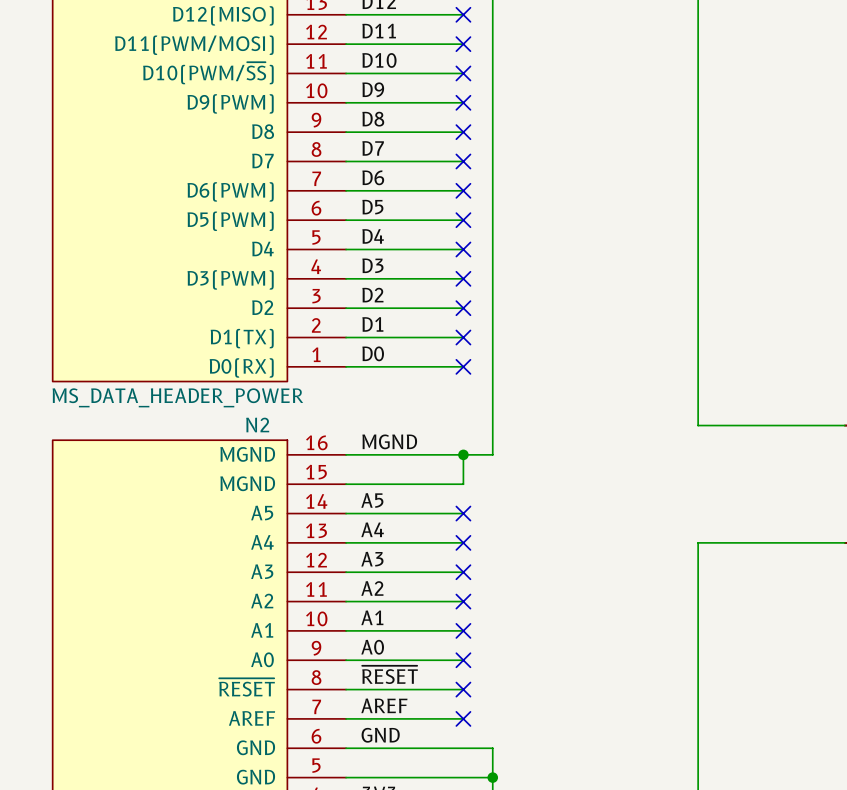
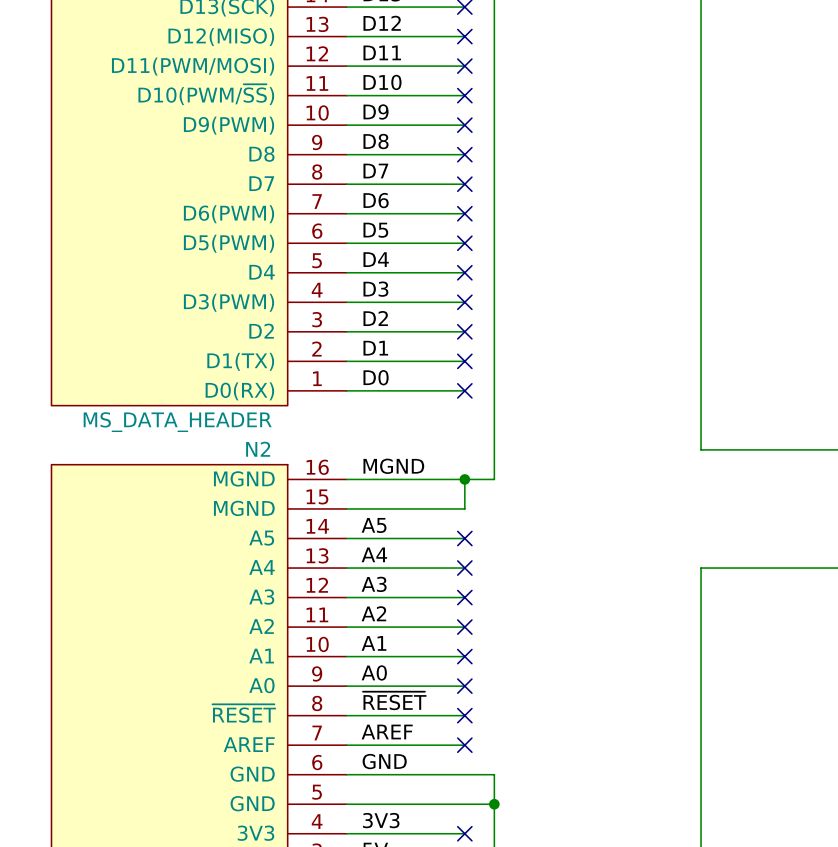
part value: MS_DATA_HEADER_POWER (177, 397) -> MS_DATA_HEADER (177, 422)

